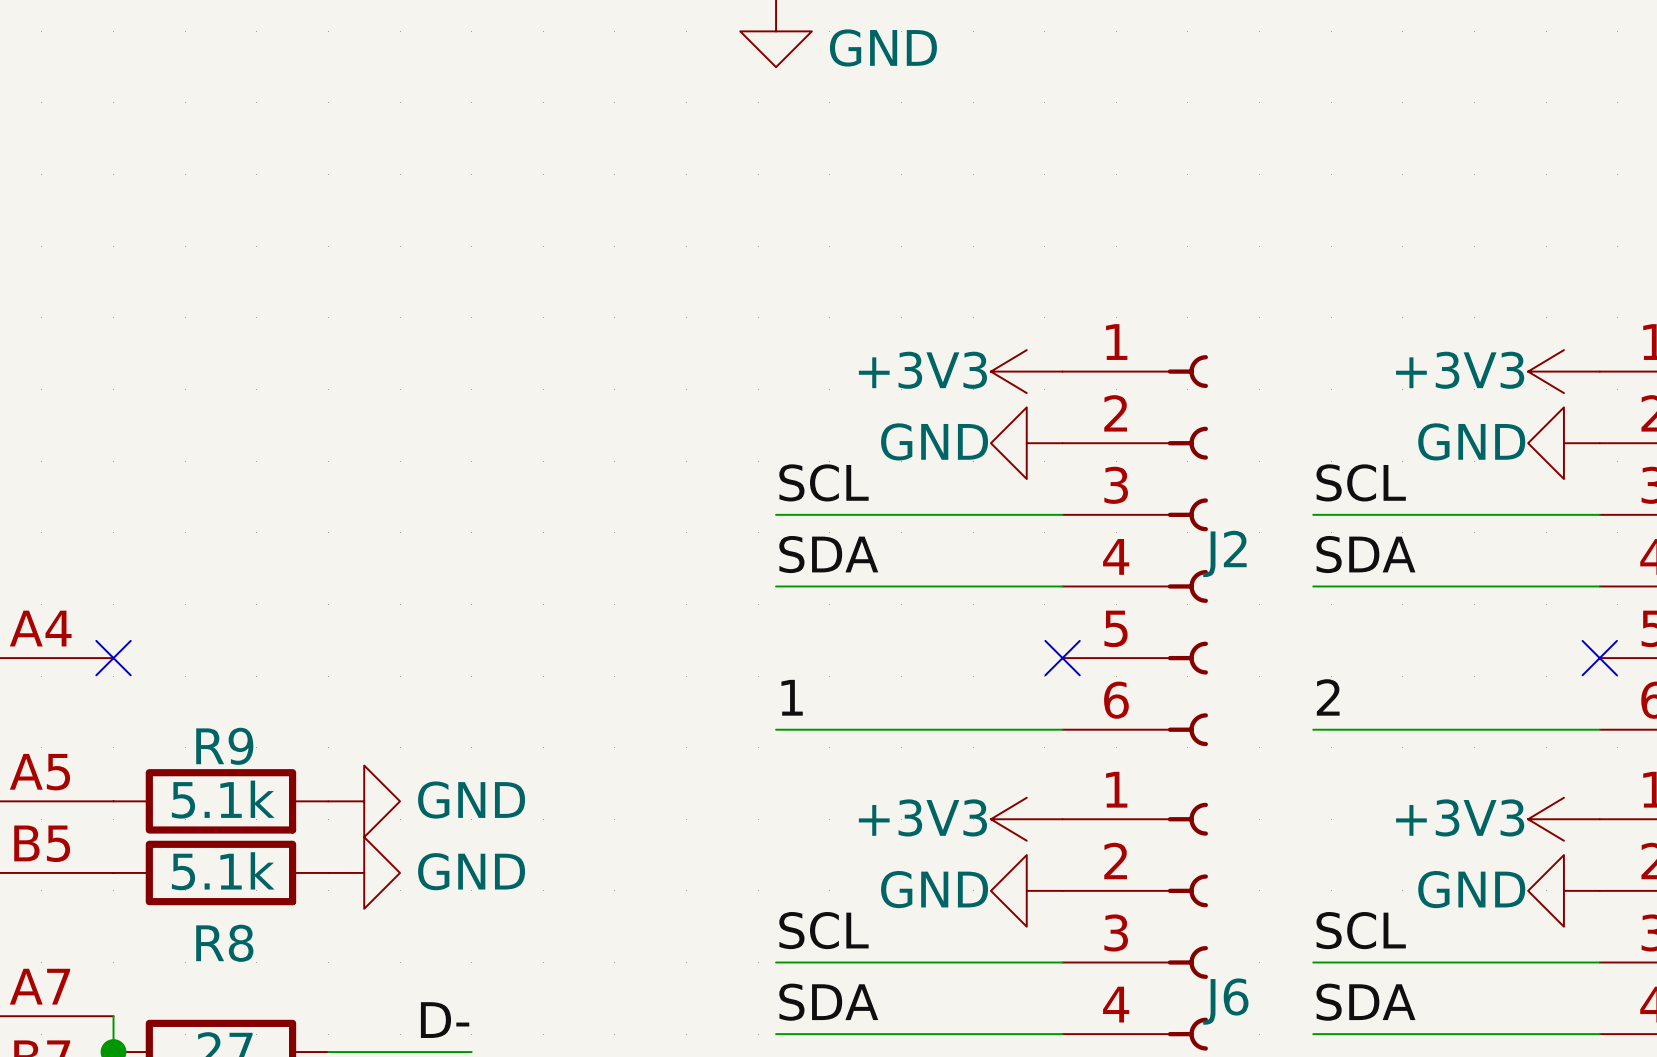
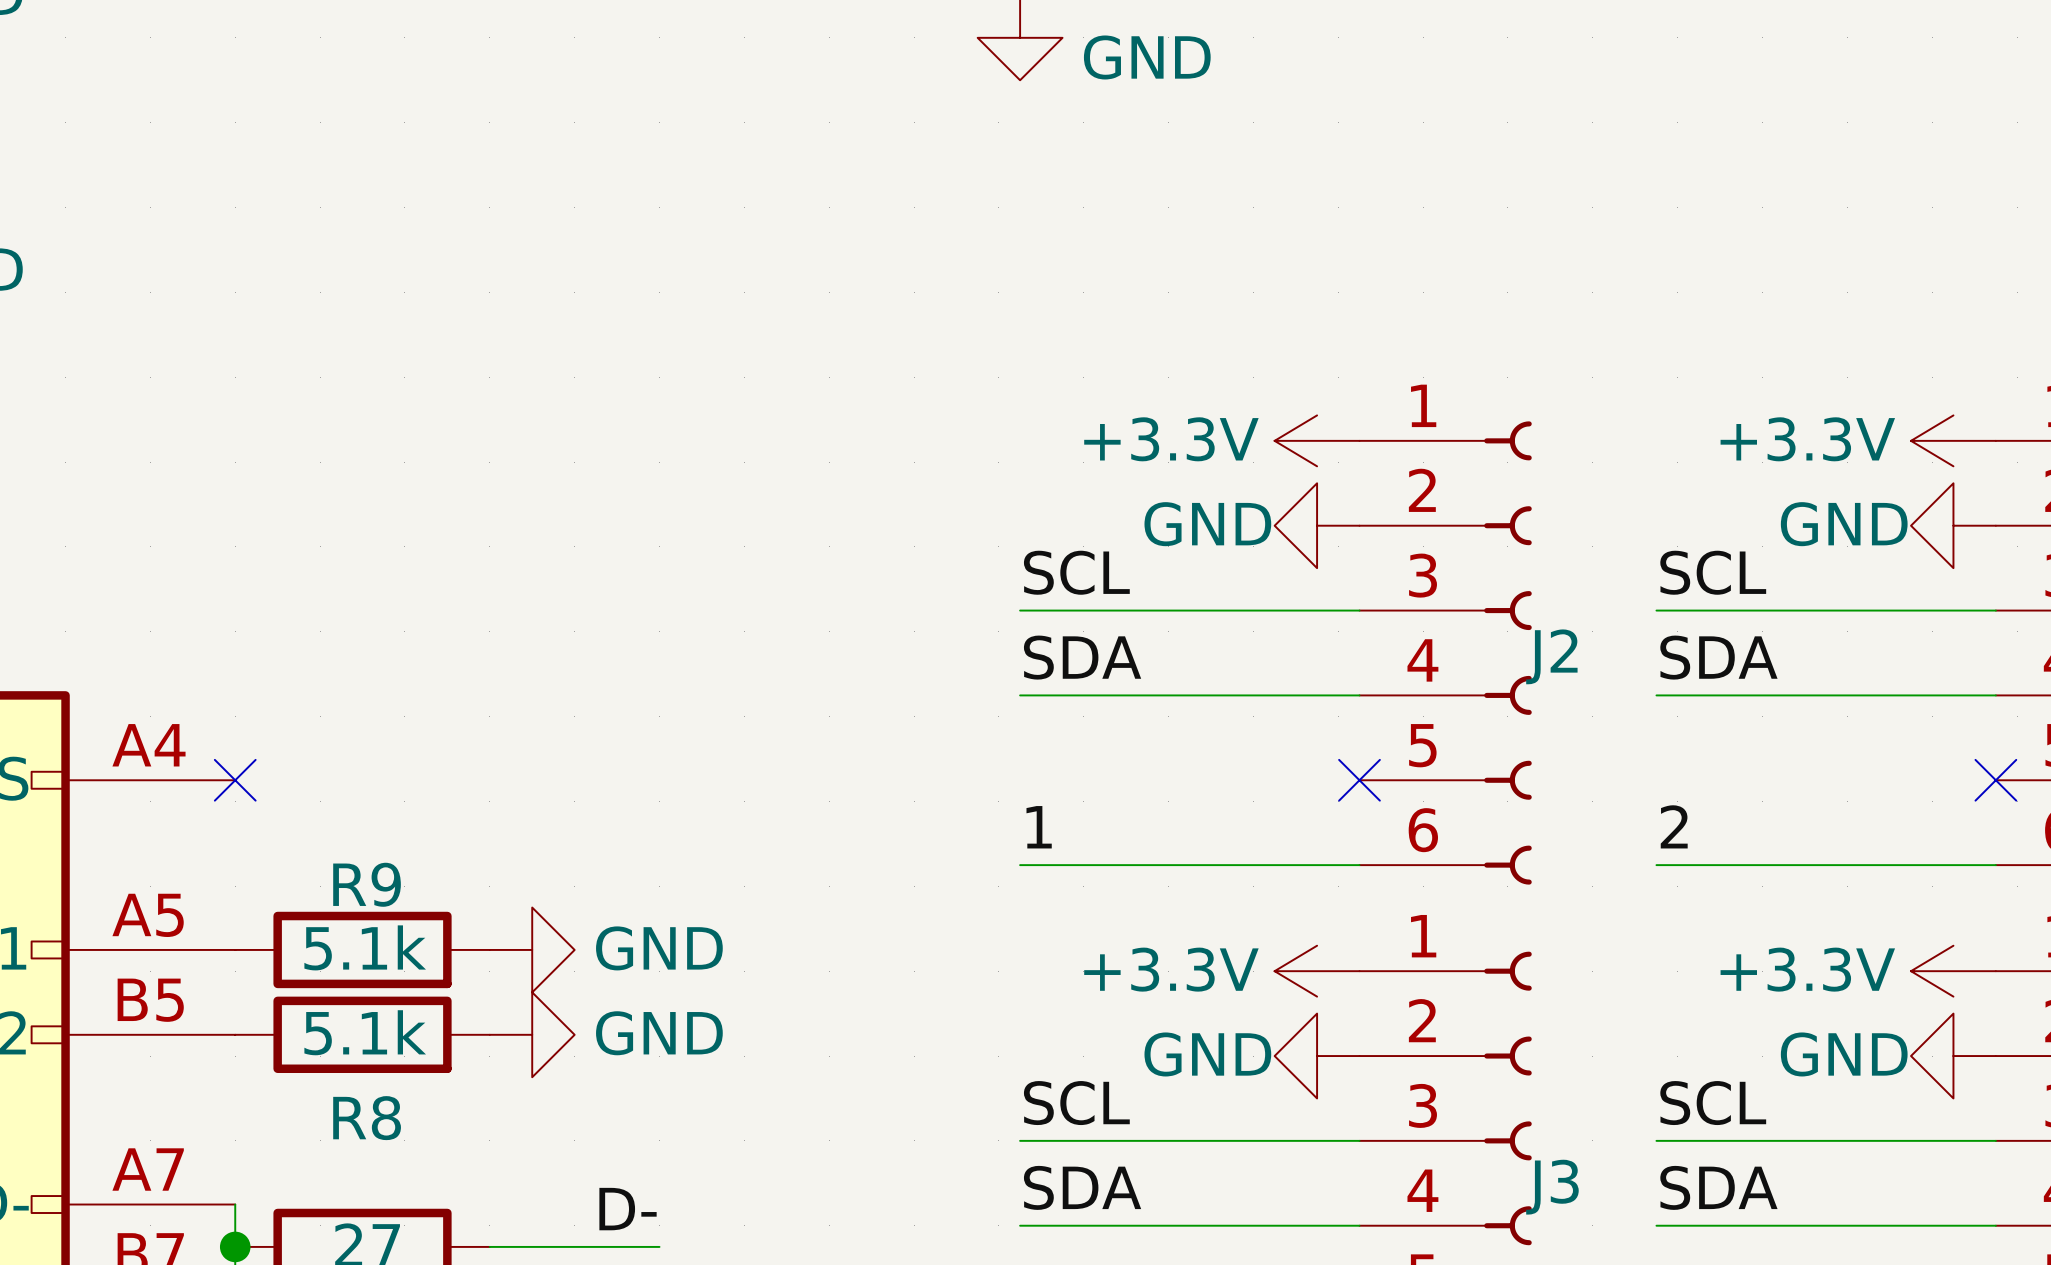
power symbol: +3V3 (1026, 371) -> +3.3V (1317, 440)
power symbol: +3V3 (1563, 371) -> +3.3V (1953, 440)
power symbol: +3V3 (1026, 819) -> +3.3V (1317, 971)
power symbol: +3V3 (1563, 819) -> +3.3V (1953, 971)
J6 name: J6 (1225, 1001) -> J3 (1552, 1187)

